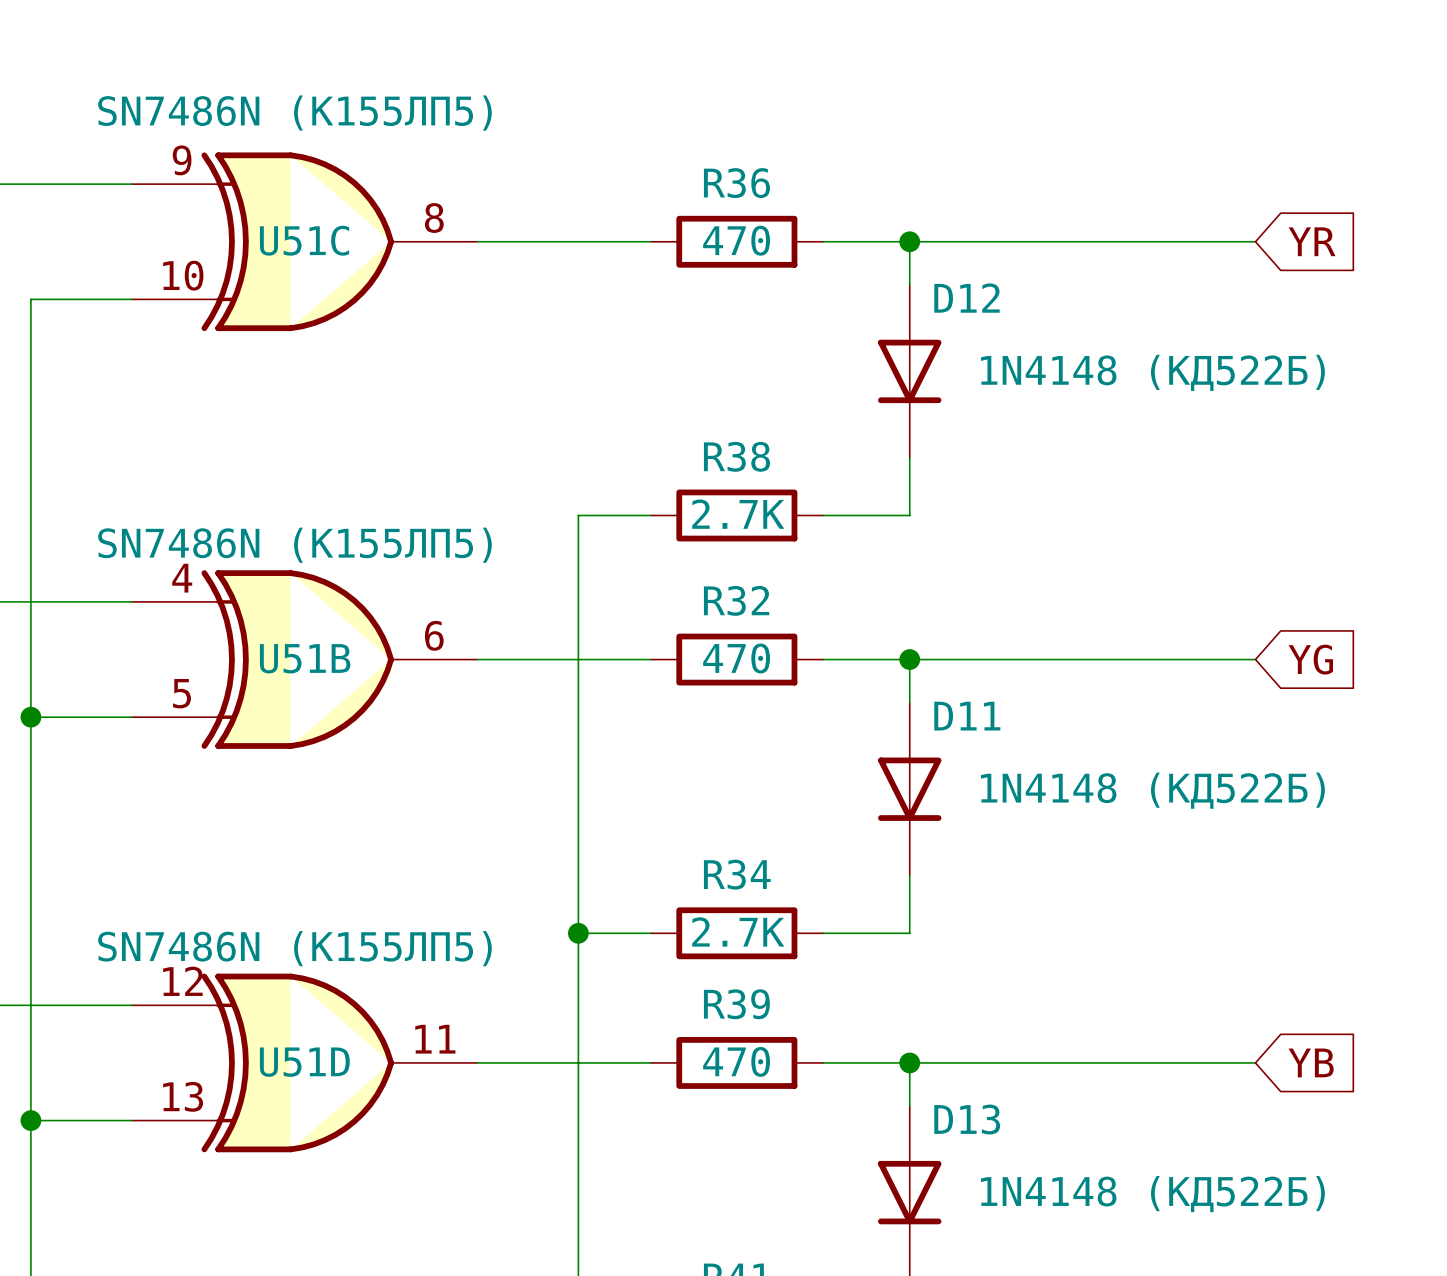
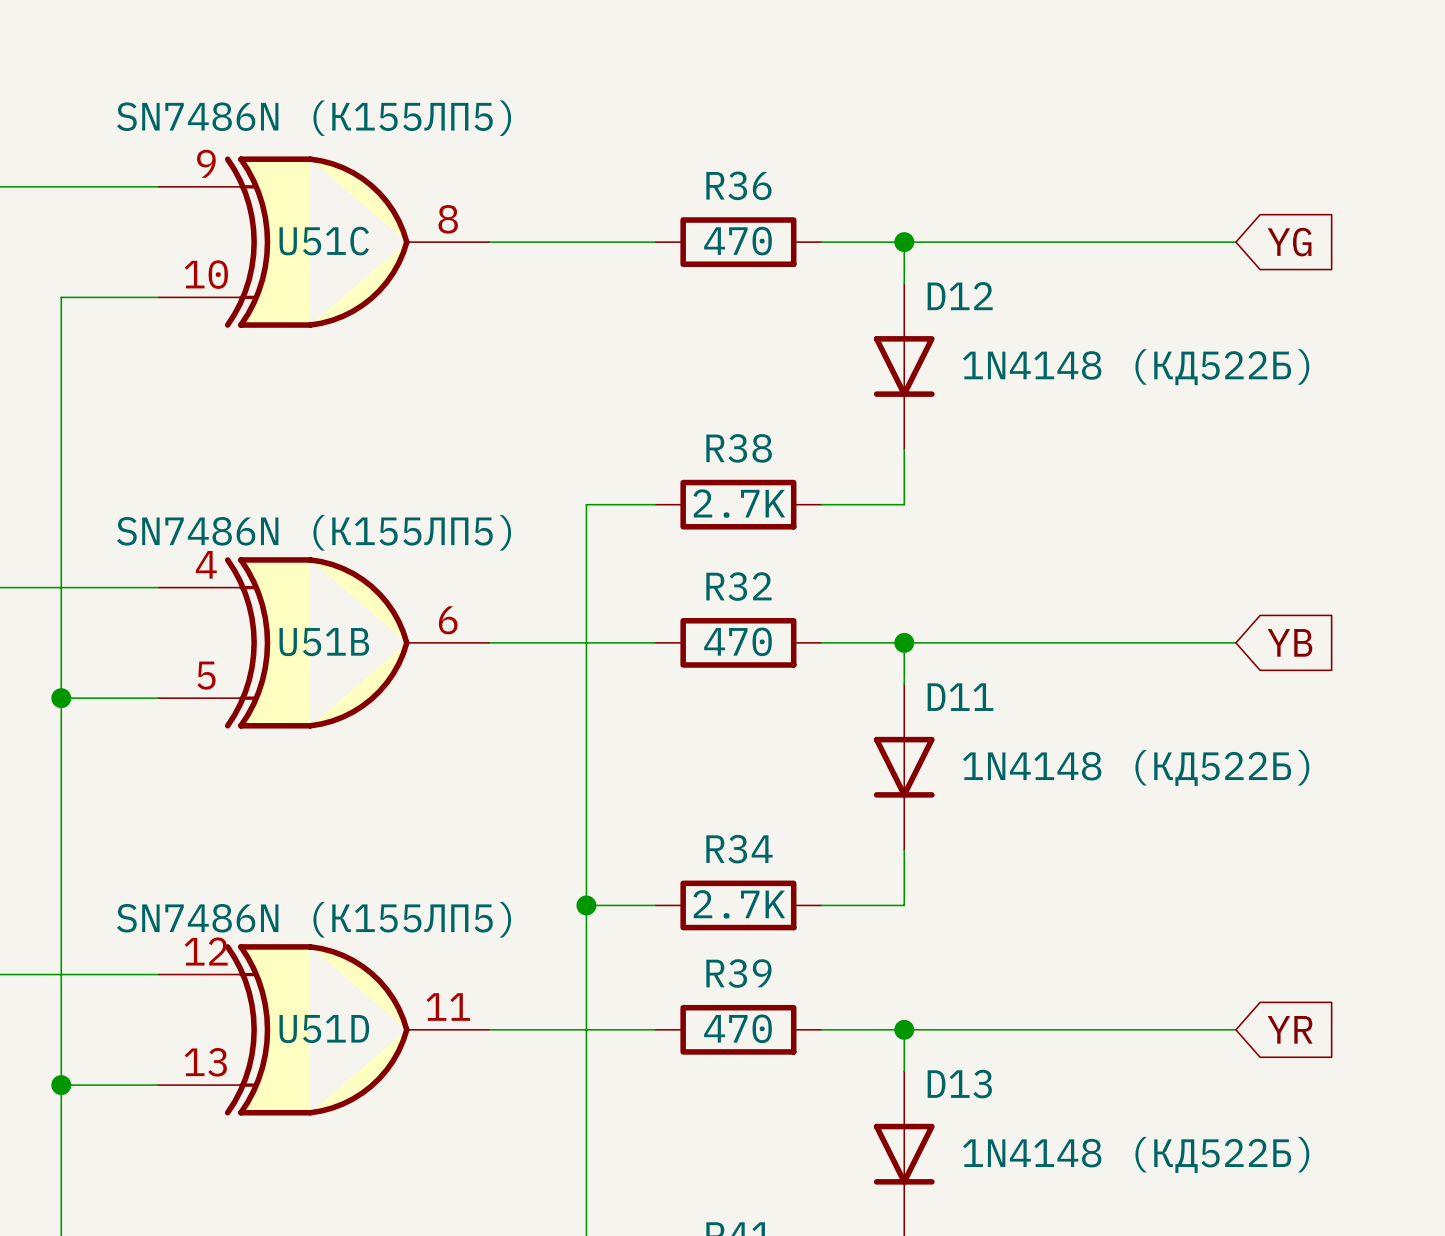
global label: YR (1312, 241) -> YG (1289, 242)
global label: YG (1310, 659) -> YB (1289, 642)
global label: YB (1311, 1062) -> YR (1290, 1029)

